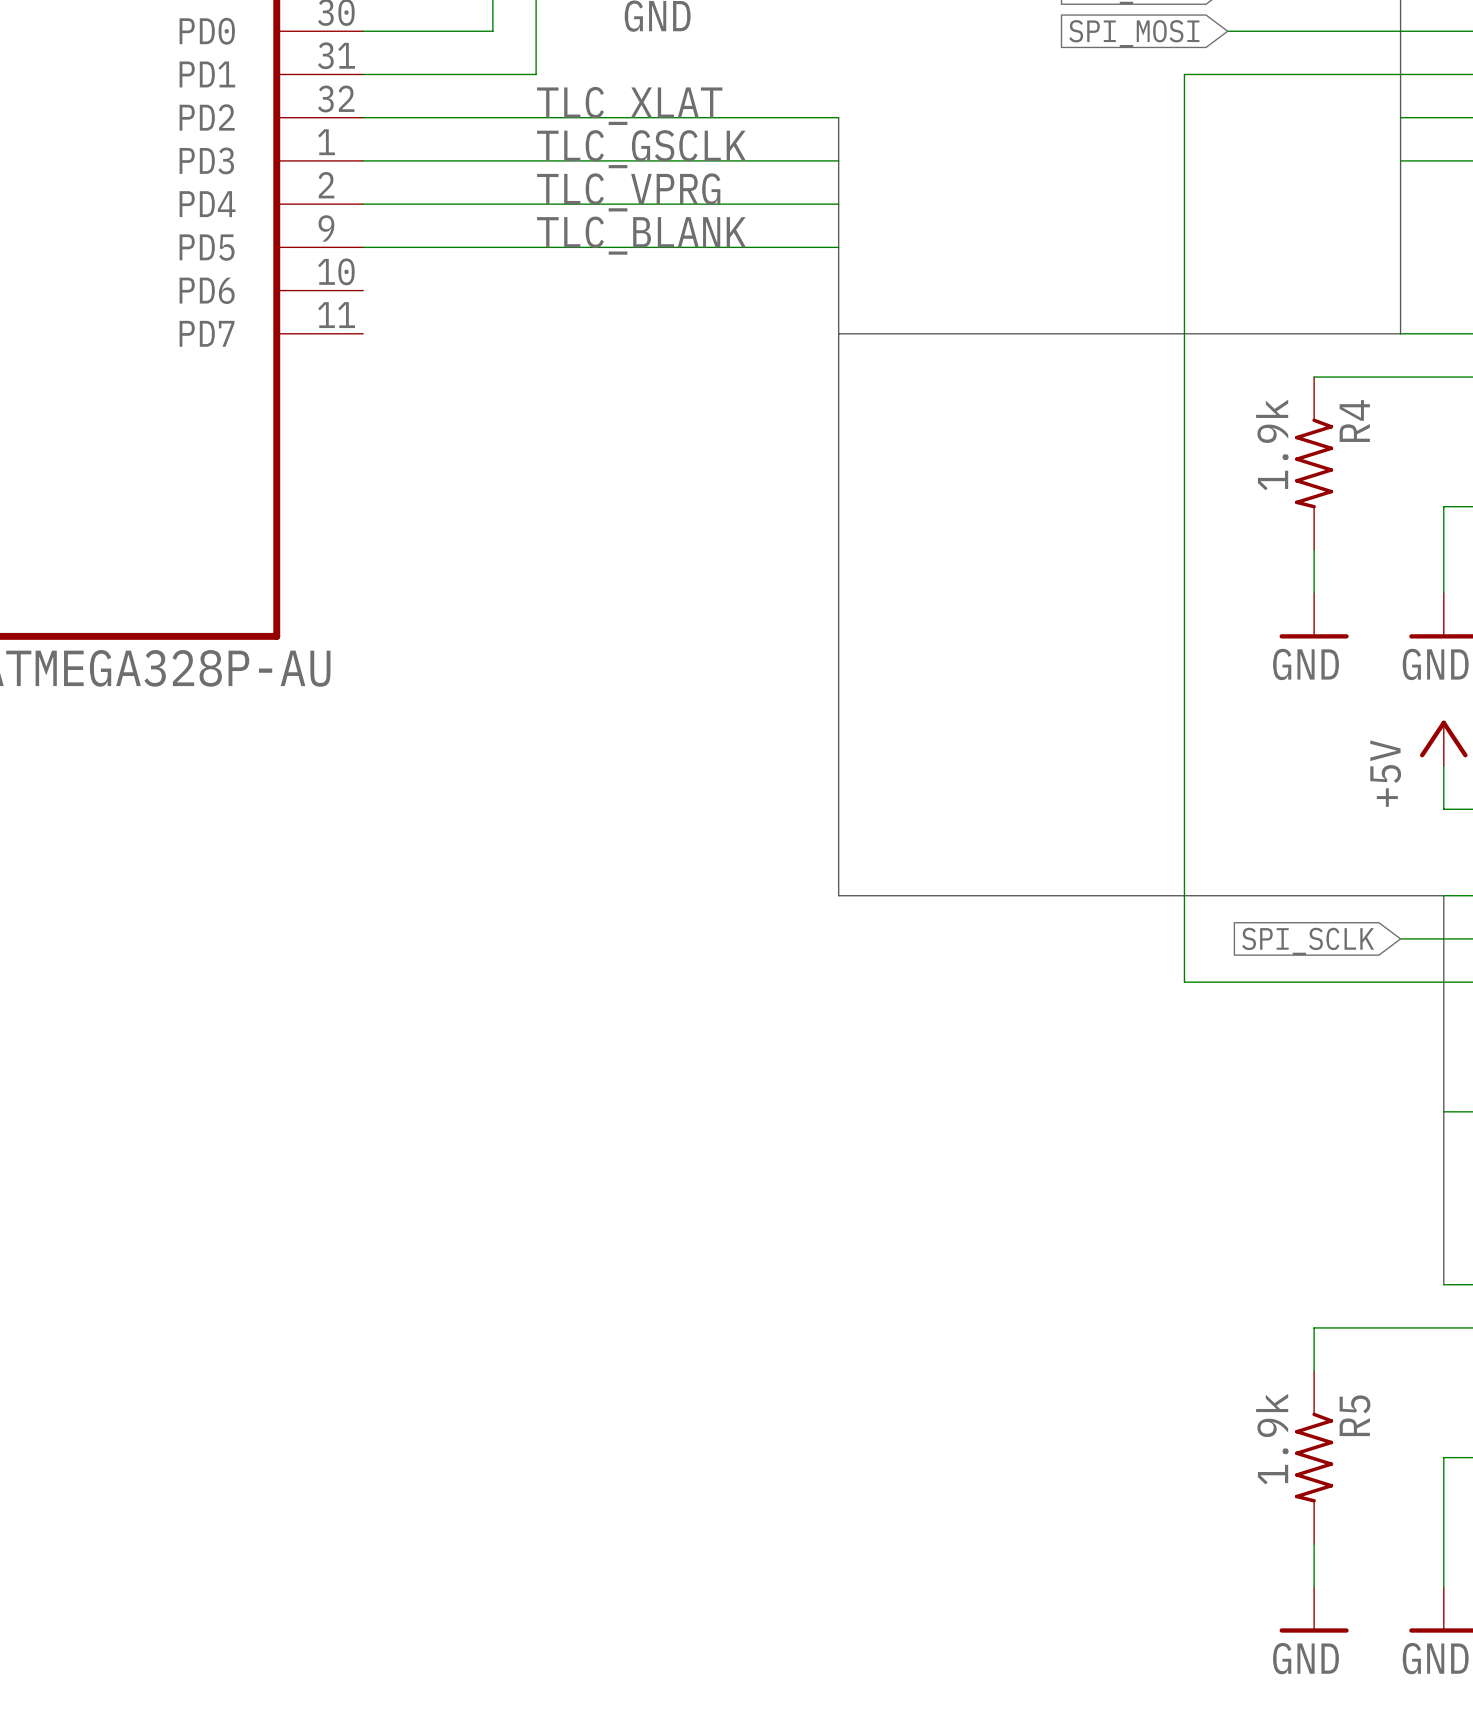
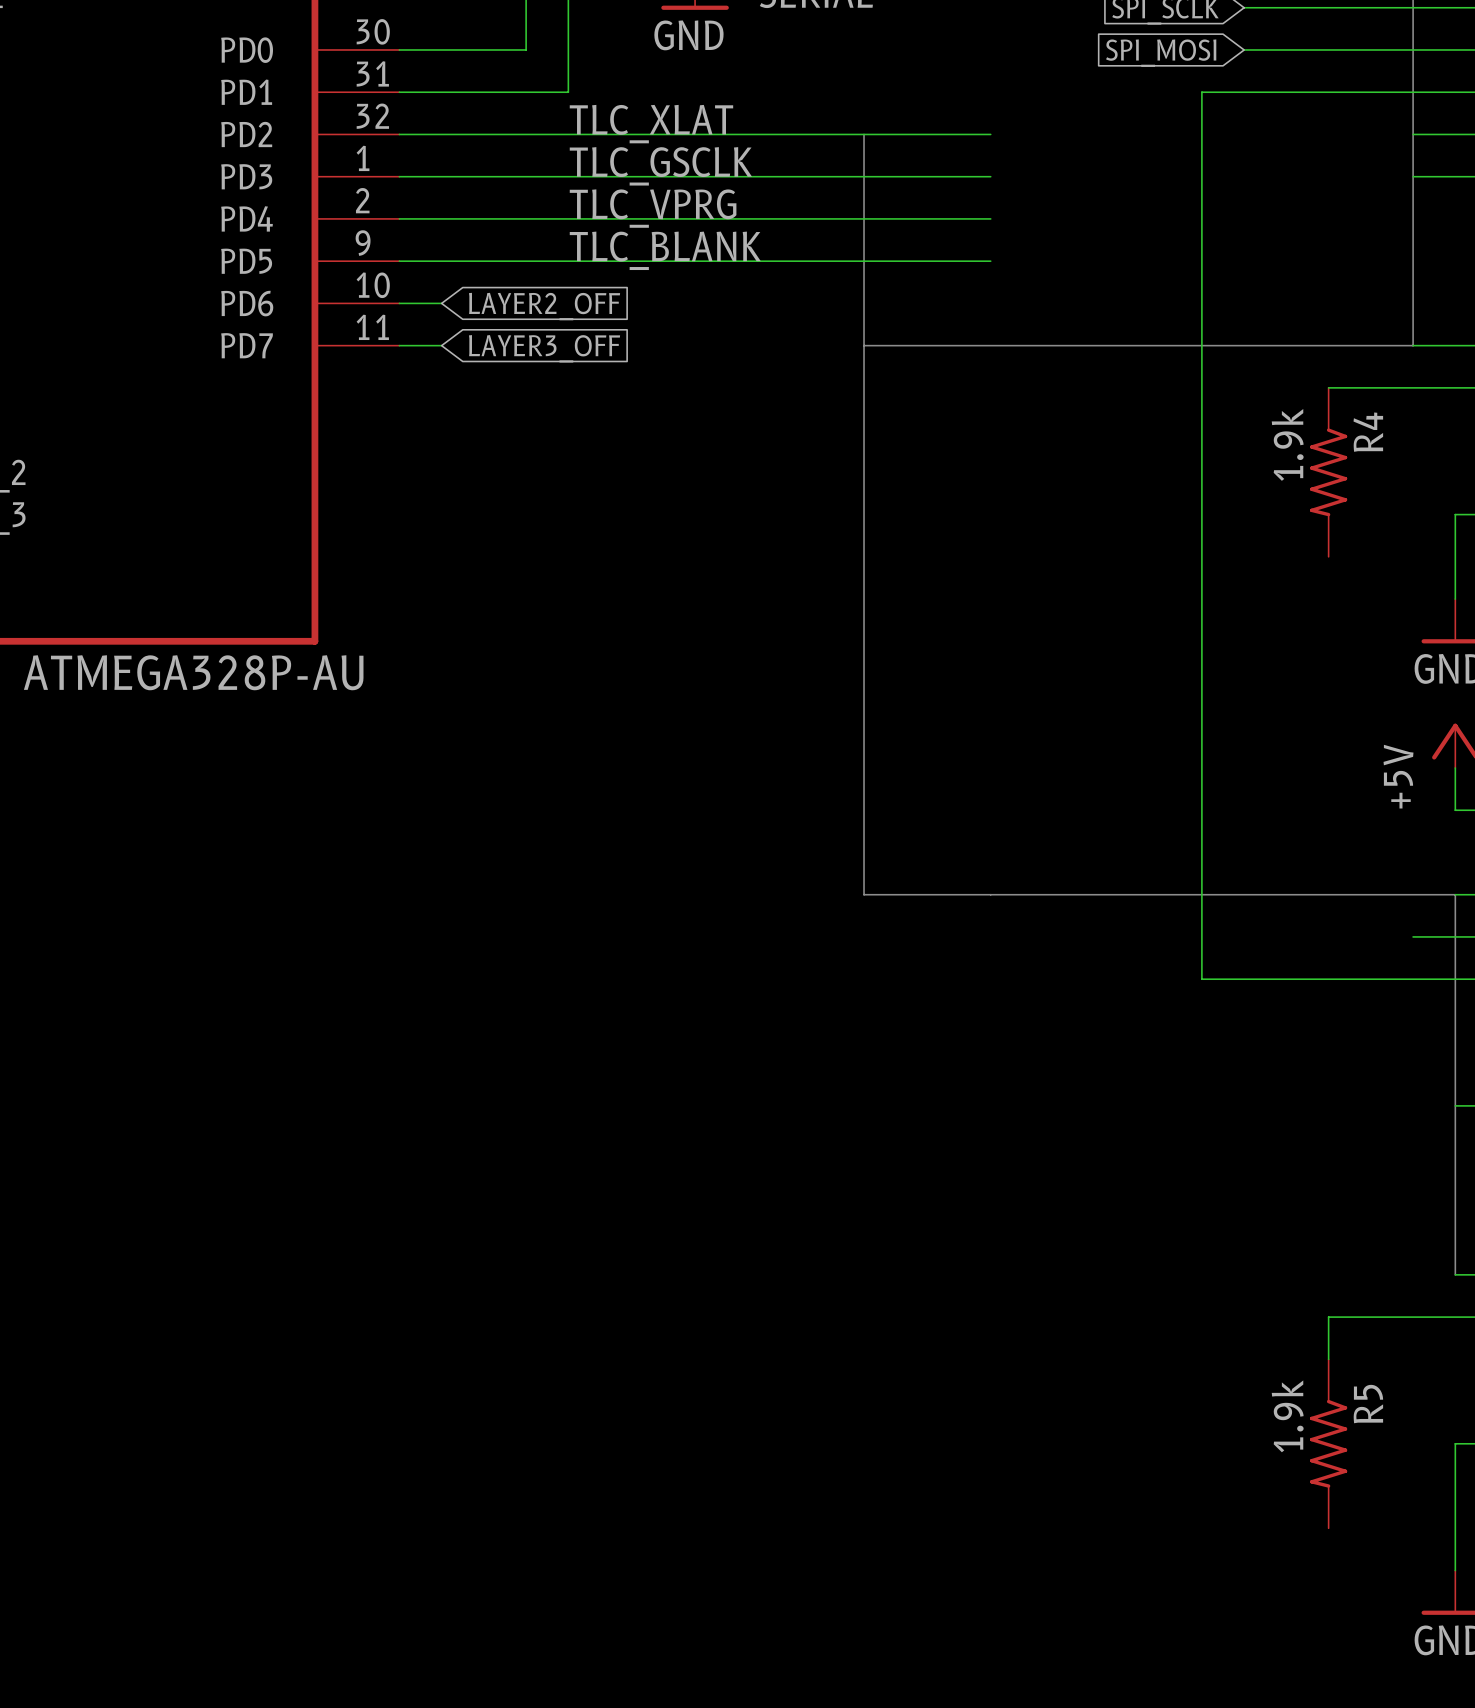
wire: none -> (864, 134) (990, 134)
wire: none -> (864, 176) (990, 176)
wire: none -> (864, 218) (990, 218)
wire: none -> (864, 261) (990, 261)
wire: none -> (399, 303) (441, 303)
global label: none -> LAYER2_OFF (544, 306)
wire: none -> (399, 345) (441, 345)
global label: none -> LAYER3_OFF (544, 348)
wire: (1314, 549) (1314, 593) -> none
power symbol: GND (1314, 615) -> none
global label: SPI_SCLK (1308, 941) -> none
wire: (1314, 1544) (1314, 1587) -> none
power symbol: GND (1314, 1609) -> none

